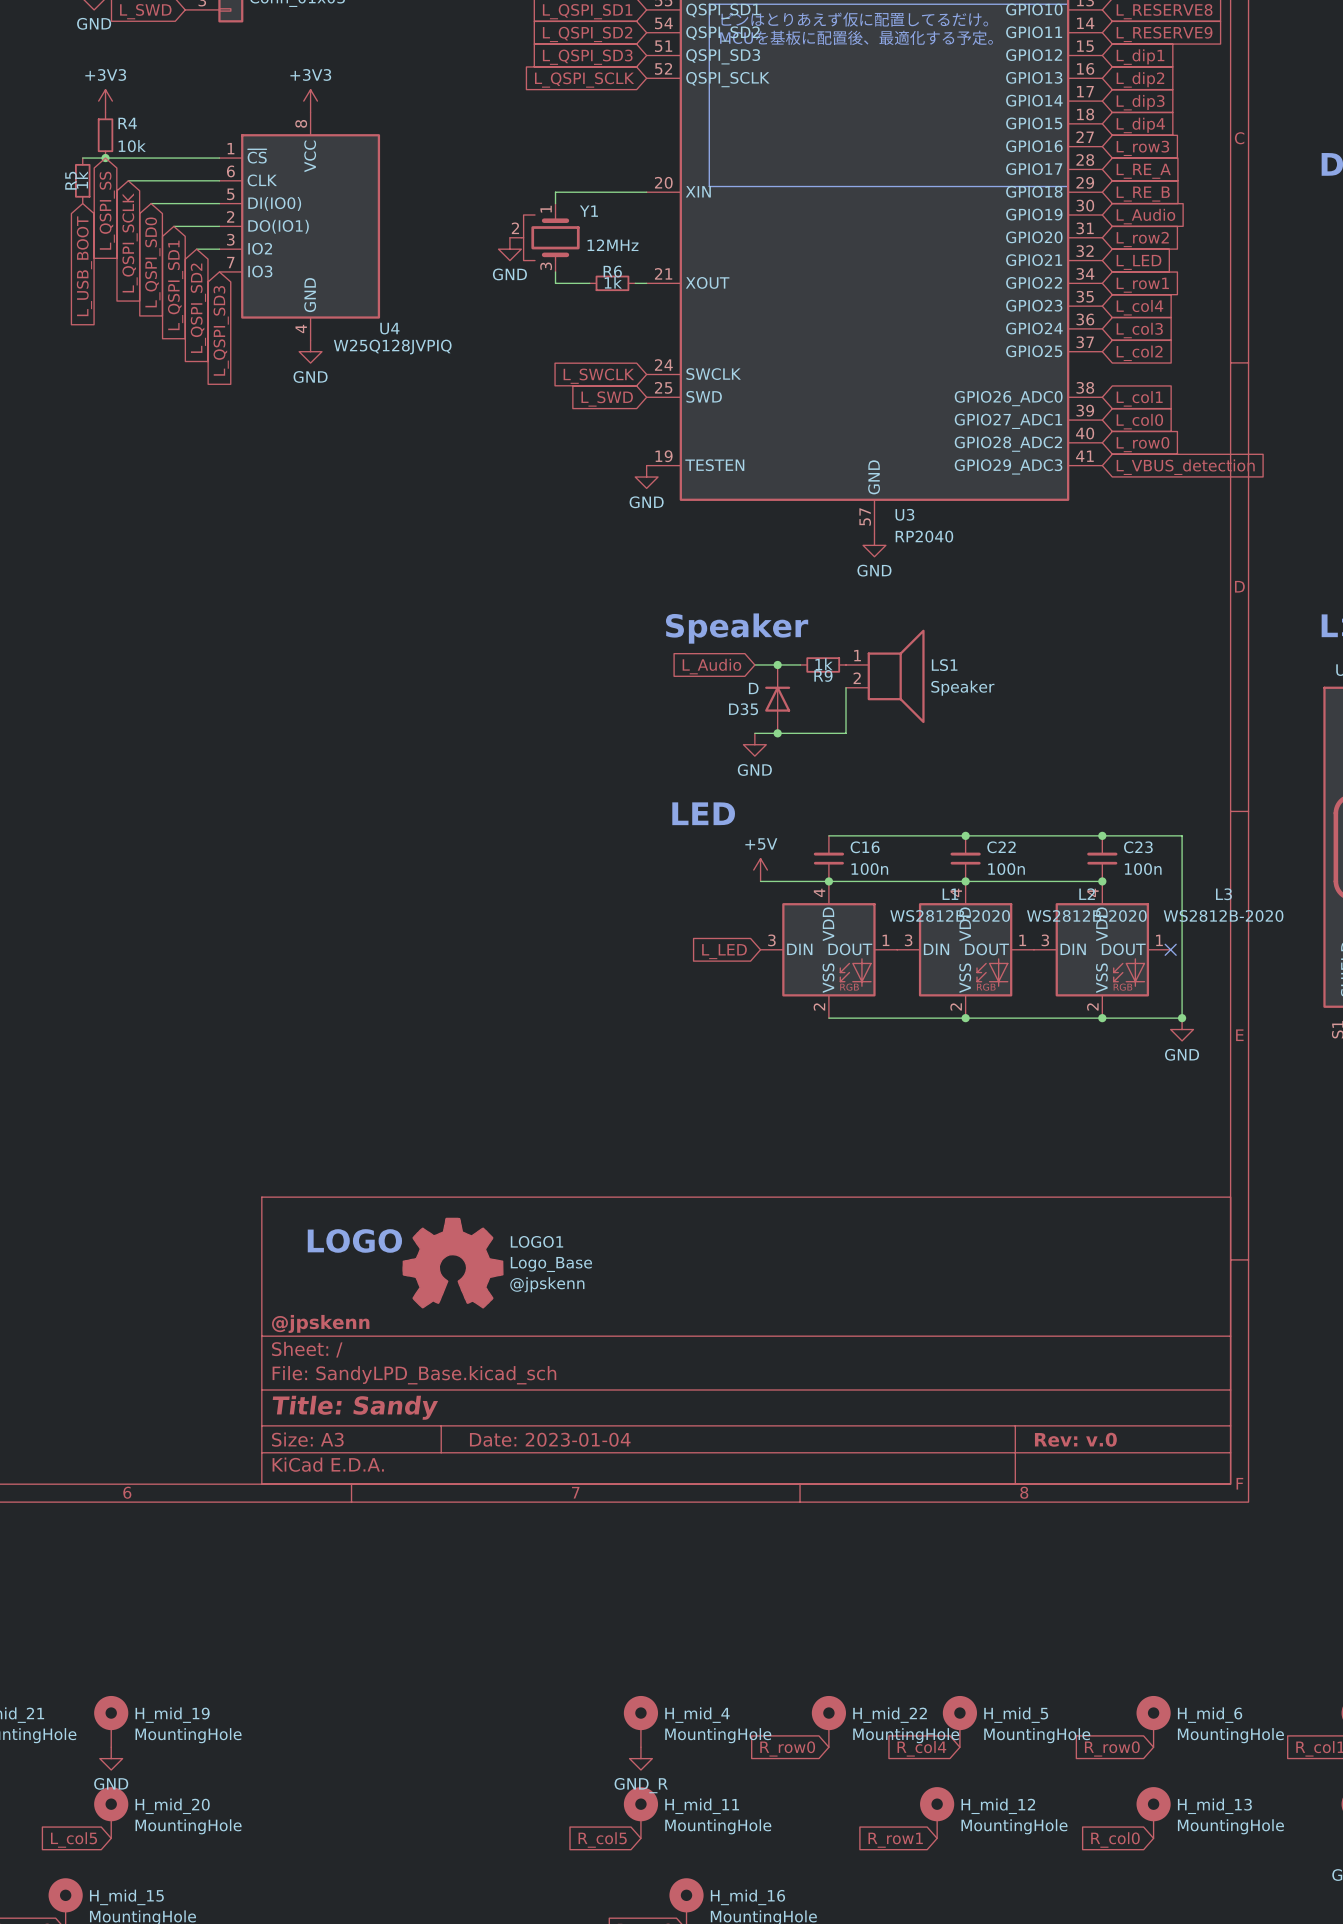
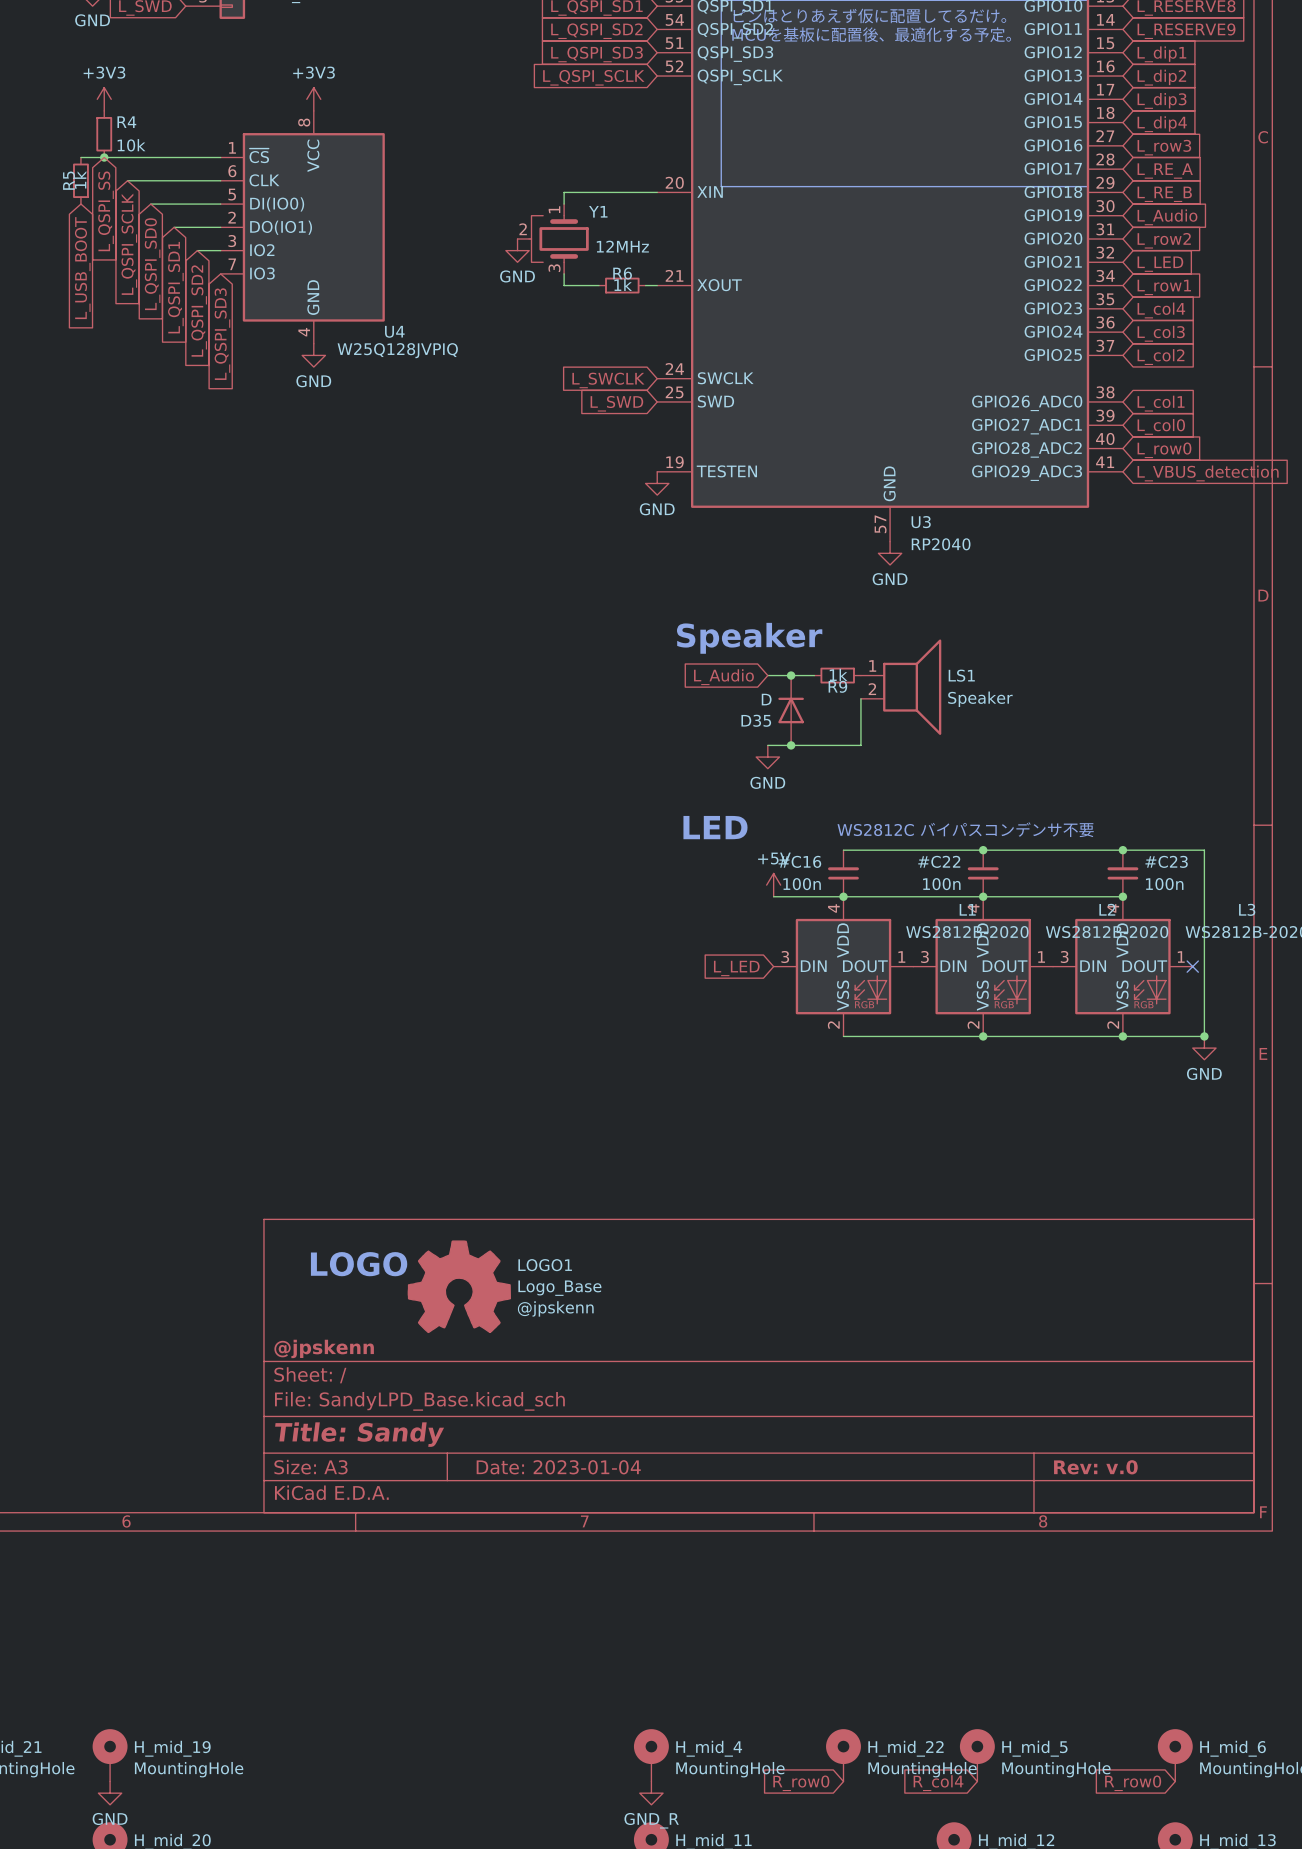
text: none -> WS2812C バイパスコンデンサ不要 (965, 829)
C16: 100n (828, 858) -> none
#C16: none -> 100n (843, 873)
C22: 100n (965, 858) -> none
#C22: none -> 100n (983, 873)
C23: 100n (1102, 858) -> none
#C23: none -> 100n (1122, 873)

